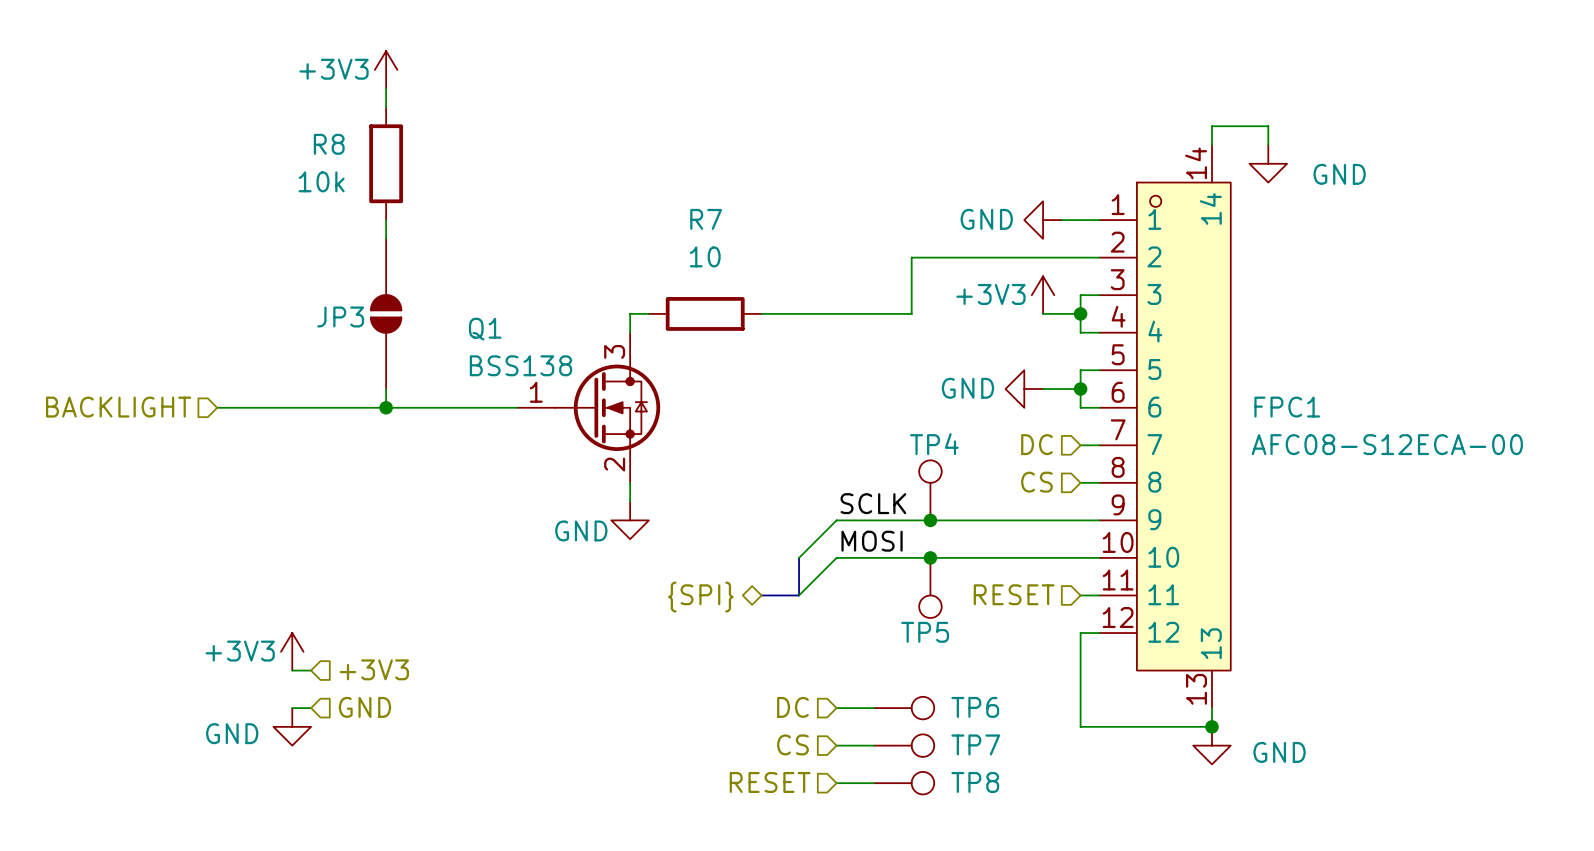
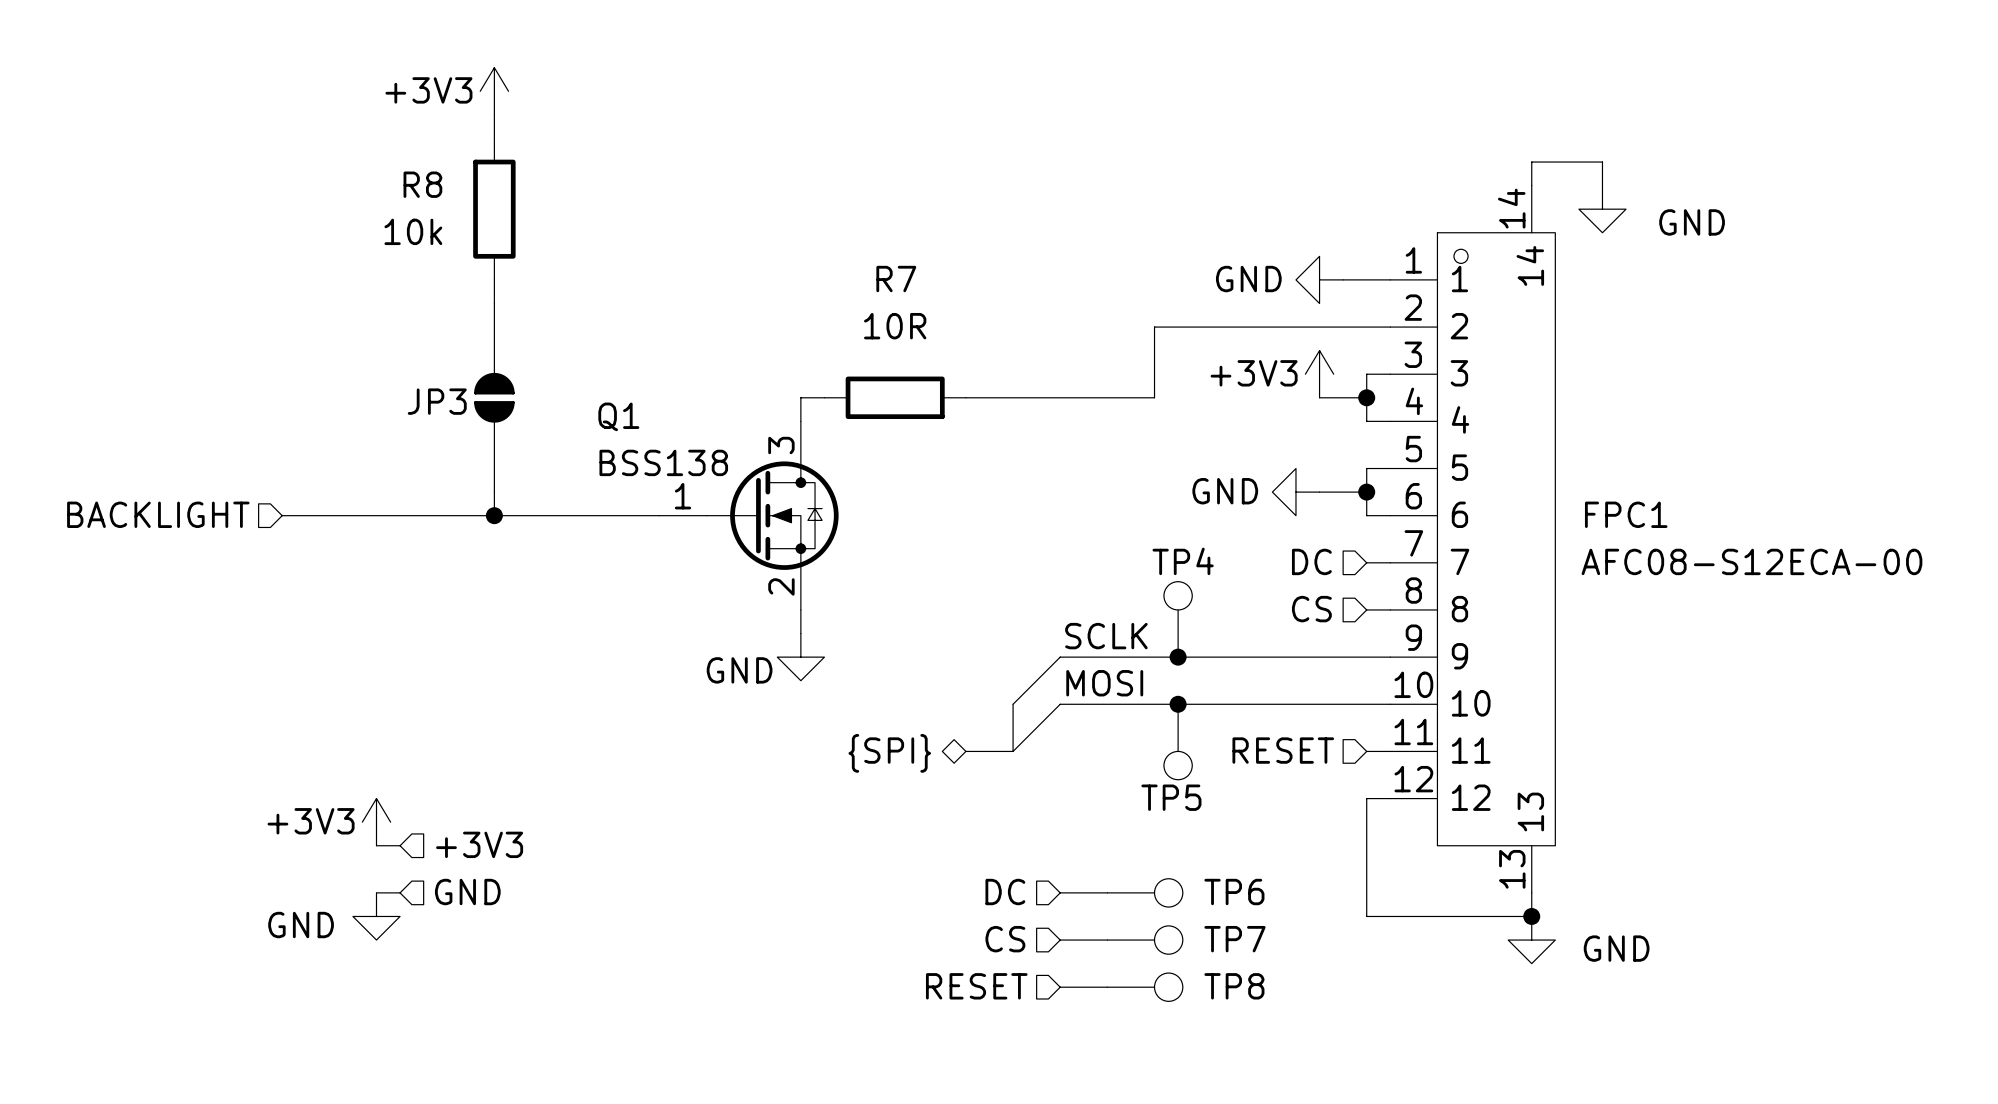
R7 value: 10 (705, 256) -> 10R (895, 326)

